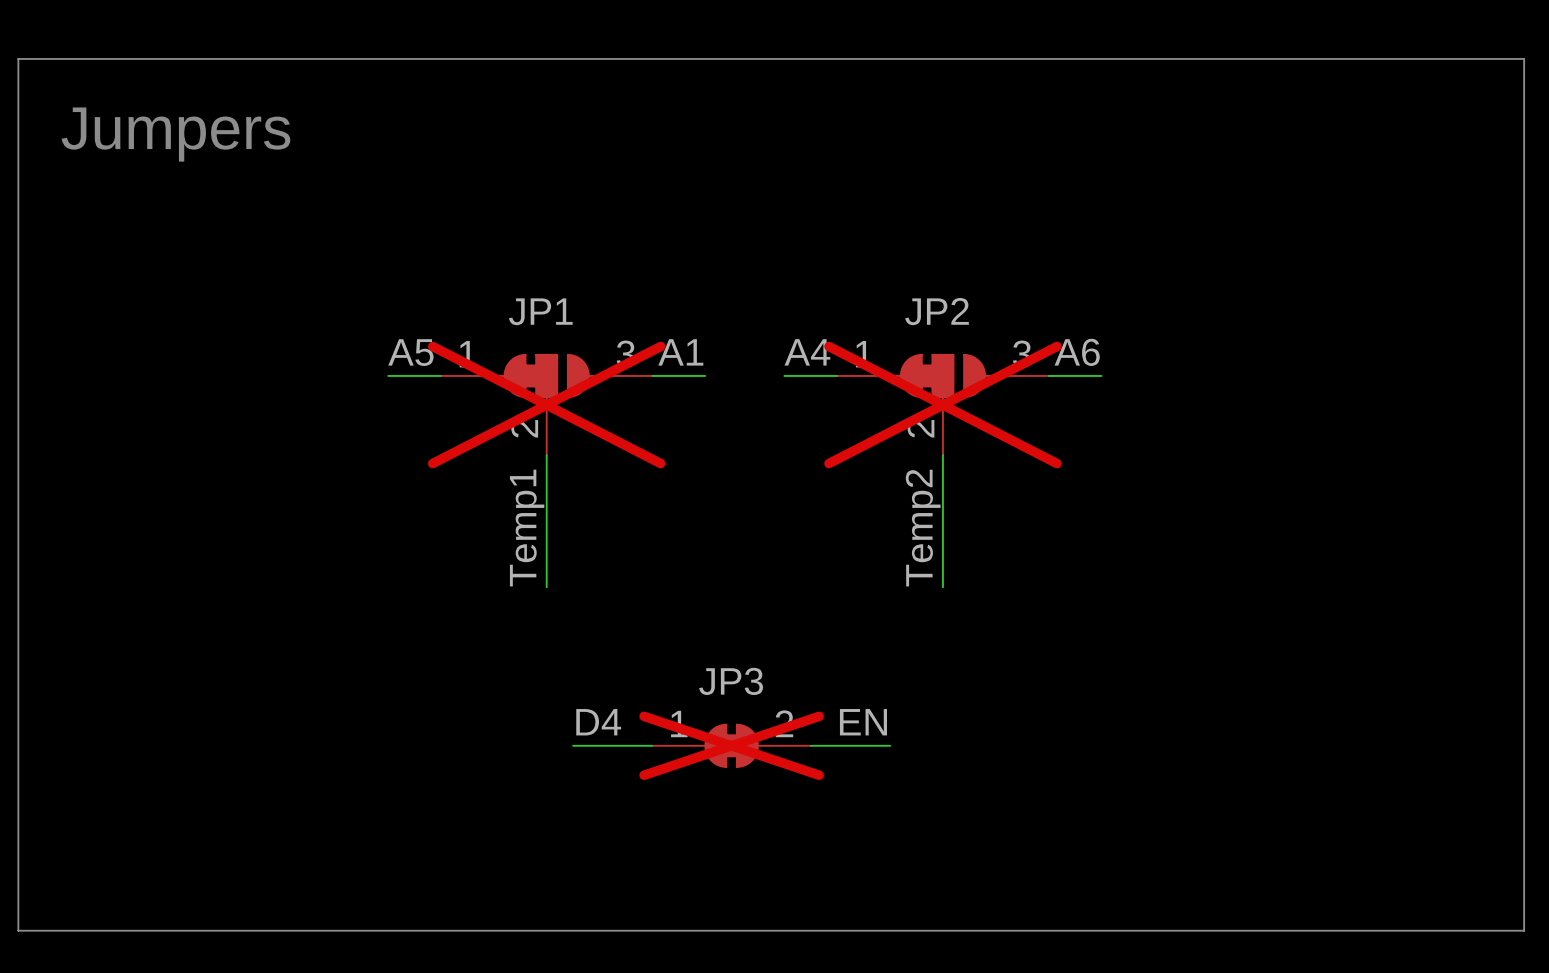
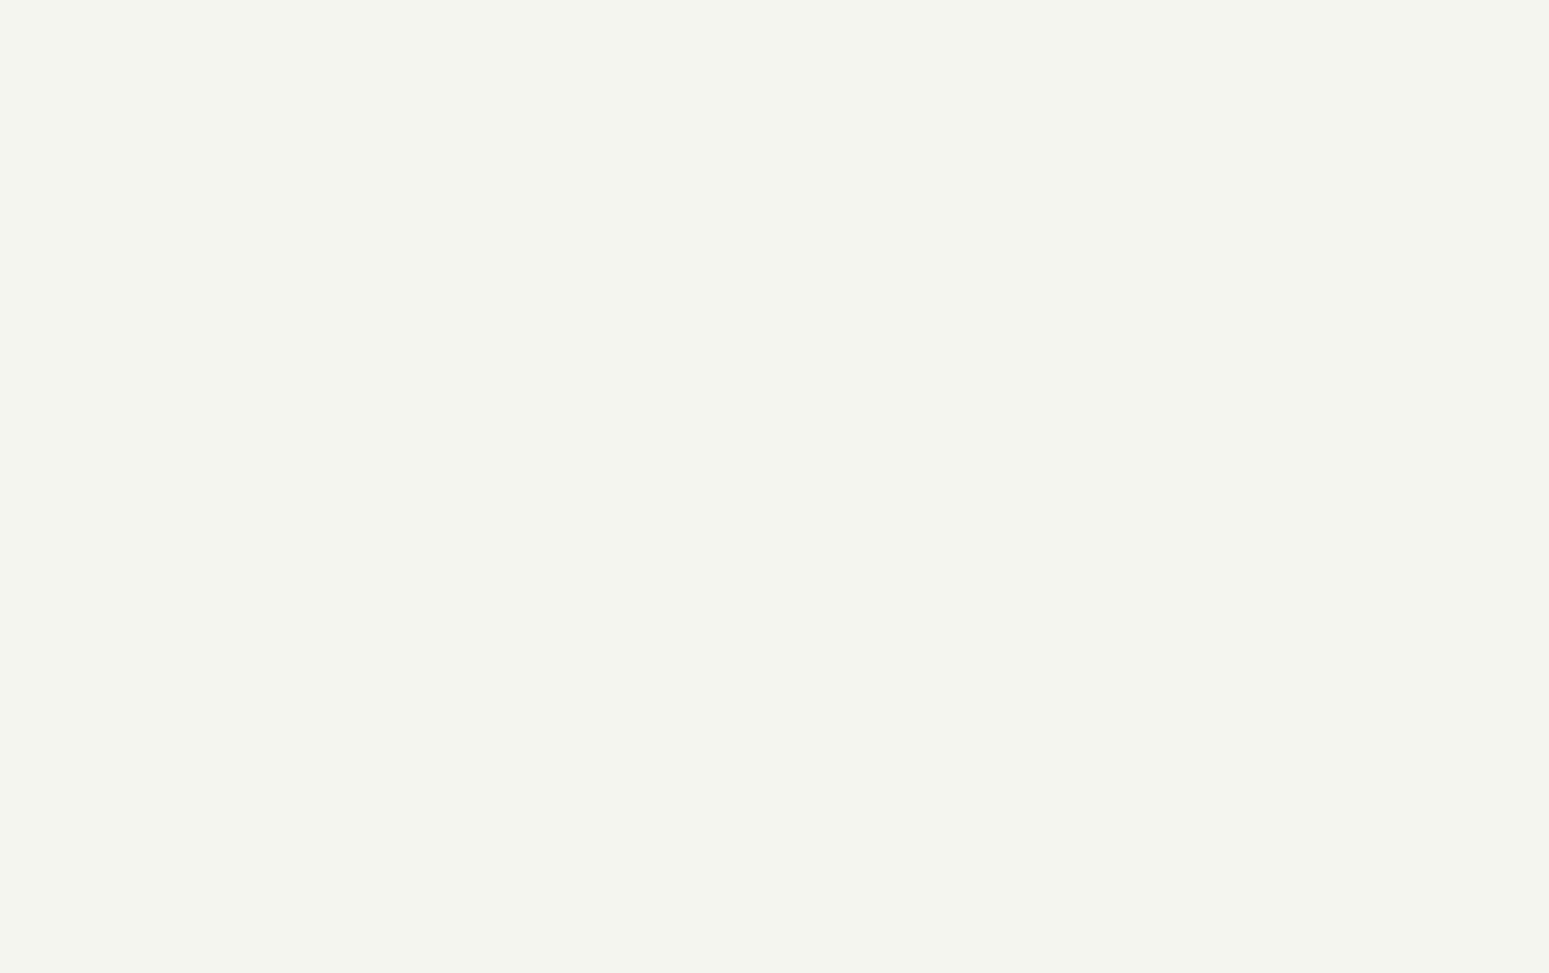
line: (18, 58) (1524, 58) (1524, 930) (18, 930) (18, 58) -> none
text: Jumpers (175, 134) -> none
label: A5 (410, 352) -> none
label: A1 (680, 352) -> none
label: A4 (807, 352) -> none
label: A6 (1077, 352) -> none
wire: (388, 375) (441, 375) -> none
wire: (652, 375) (705, 375) -> none
wire: (784, 375) (837, 375) -> none
wire: (1048, 375) (1101, 375) -> none
JP1: (546, 405) -> none
JP2: (942, 405) -> none
wire: (546, 455) (546, 587) -> none
wire: (942, 455) (942, 587) -> none
label: Temp1 (527, 528) -> none
label: Temp2 (923, 528) -> none
label: D4 (598, 722) -> none
label: EN (863, 722) -> none
wire: (573, 745) (652, 745) -> none
JP3: (731, 745) -> none
wire: (810, 745) (890, 745) -> none

